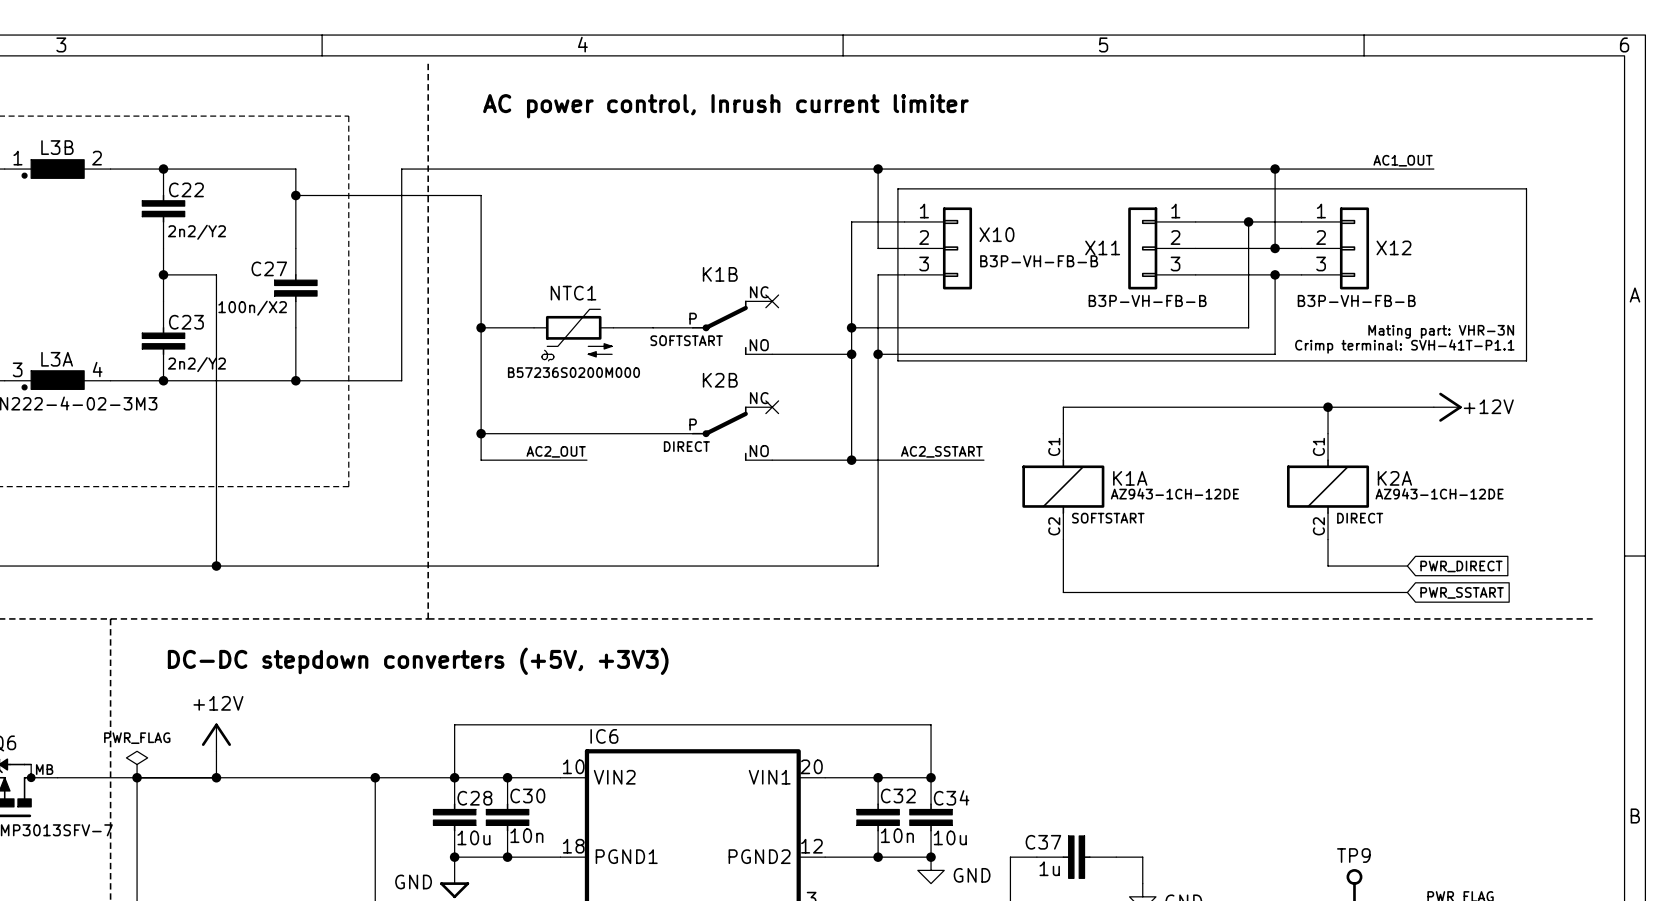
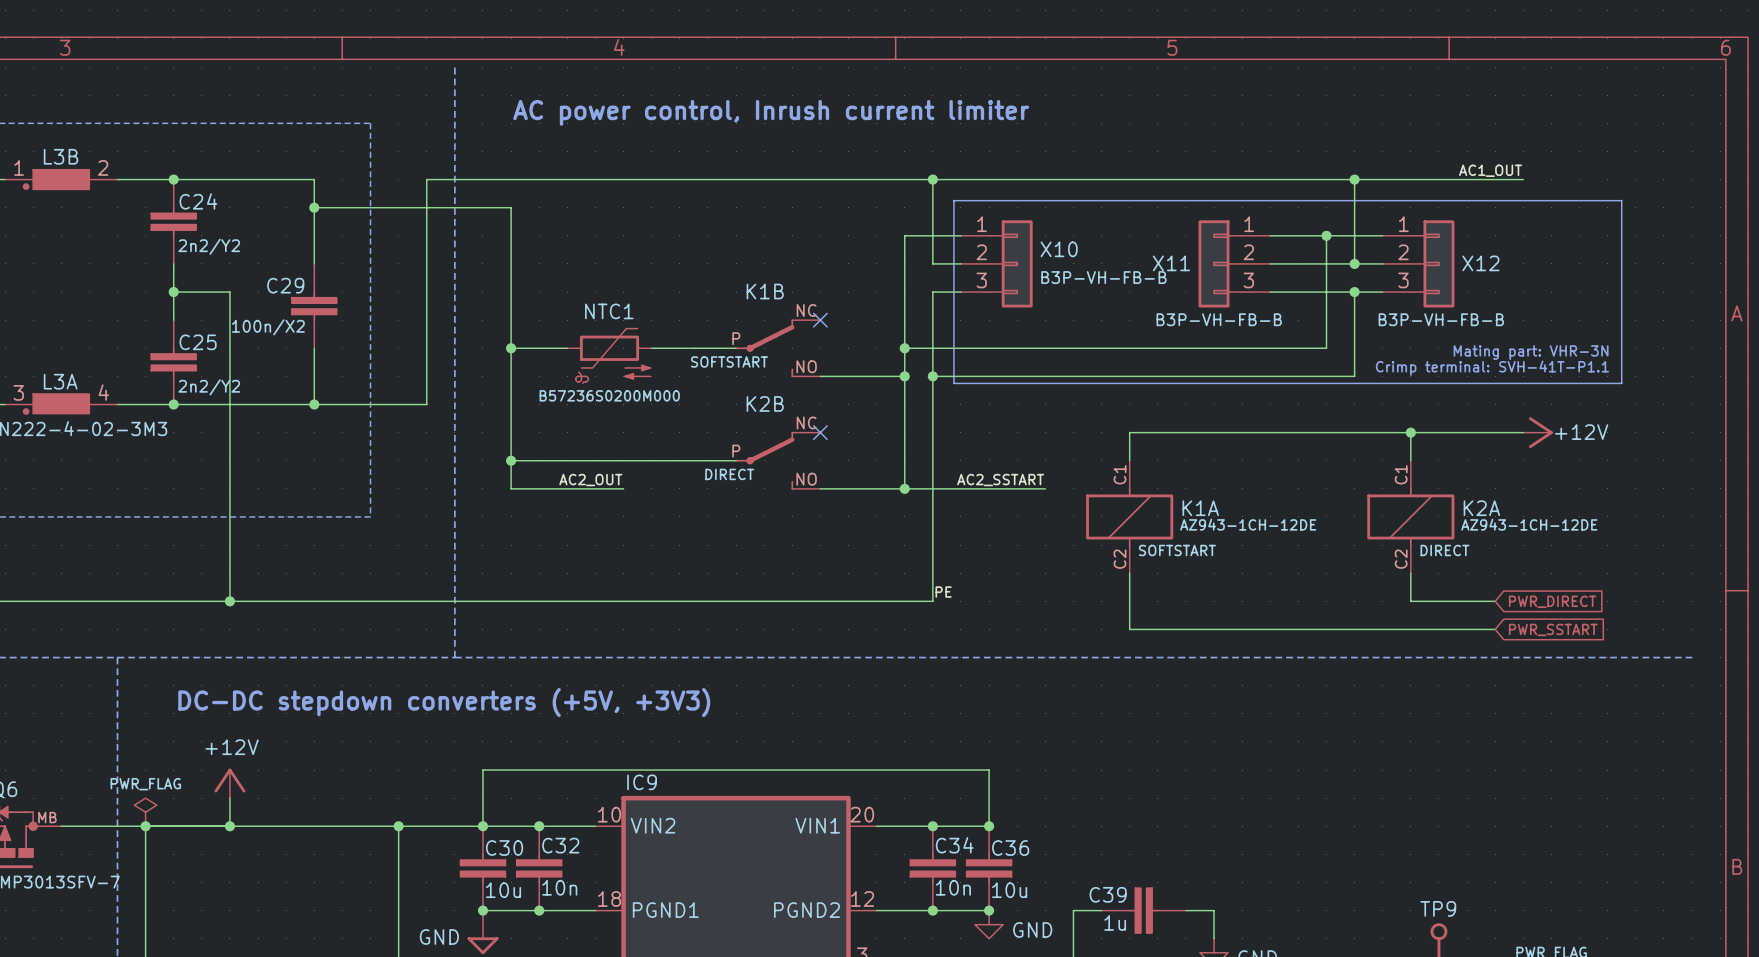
C22 name: C22 (186, 189) -> C24 (198, 201)
C27 name: C27 (269, 268) -> C29 (285, 285)
C23 name: C23 (186, 322) -> C25 (198, 342)
label: none -> PE (943, 592)
IC6 name: IC6 (604, 736) -> IC9 (642, 782)
C30 name: C30 (527, 795) -> C32 (560, 845)
C32 name: C32 (898, 795) -> C34 (954, 845)
C34 name: C34 (951, 797) -> C36 (1010, 848)
C28 name: C28 (474, 798) -> C30 (504, 848)
C37 name: C37 (1043, 842) -> C39 (1108, 894)

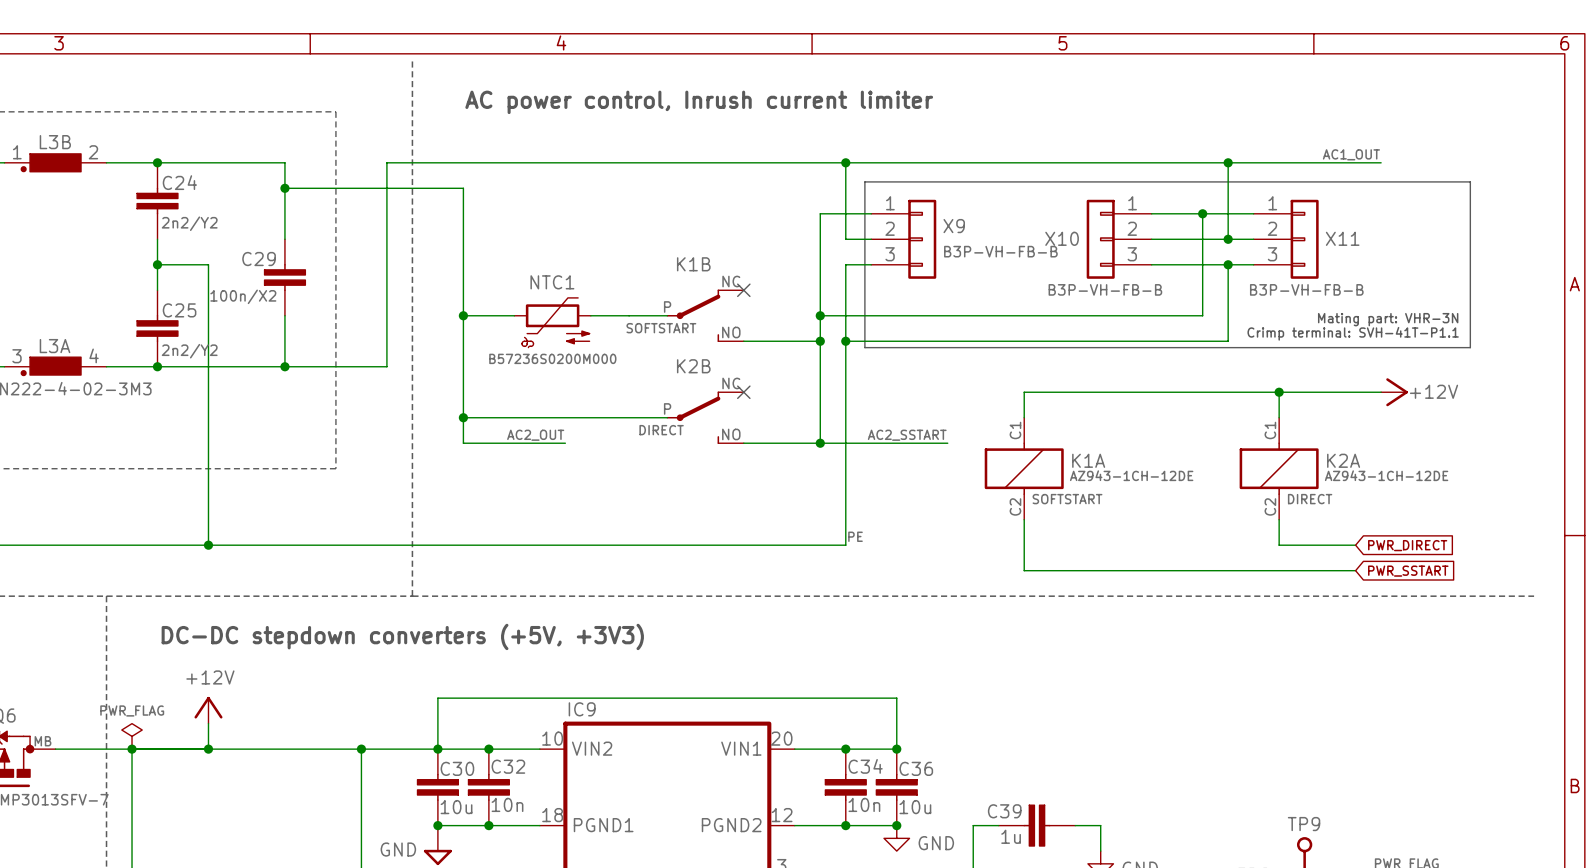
X10 name: X10 (1059, 249) -> X9 (954, 226)
X11 name: X11 (1171, 263) -> X10 (1062, 238)
X12 name: X12 (1480, 263) -> X11 (1342, 238)

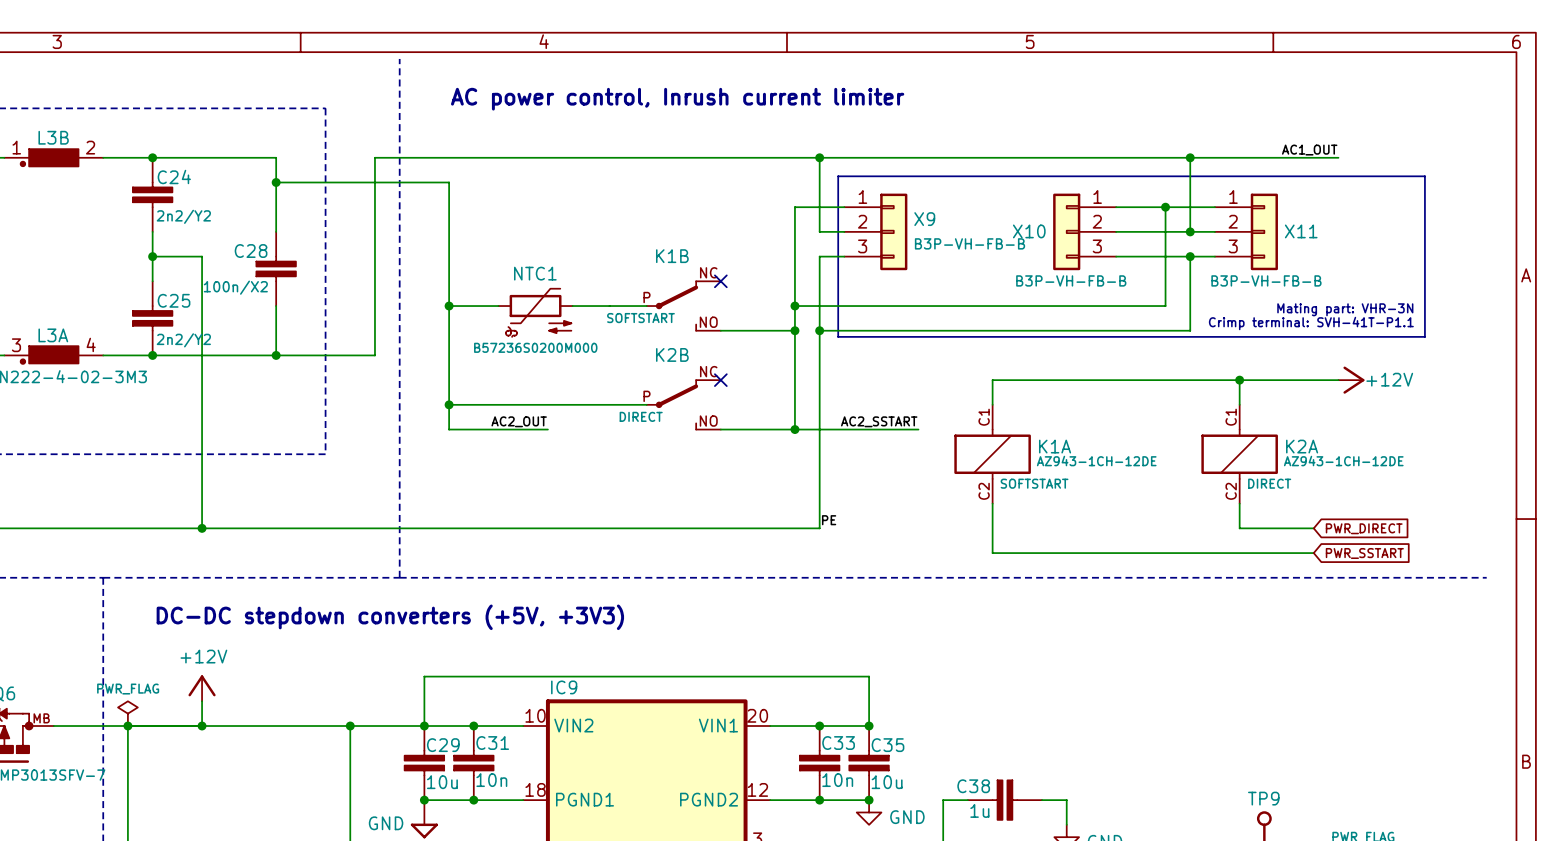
C29 name: C29 (259, 259) -> C28 (251, 251)
C32 name: C32 (508, 766) -> C31 (492, 743)
C34 name: C34 (865, 766) -> C33 (838, 743)
C30 name: C30 (457, 768) -> C29 (443, 745)
C36 name: C36 (916, 768) -> C35 (888, 745)
C39 name: C39 (1004, 811) -> C38 (973, 786)

